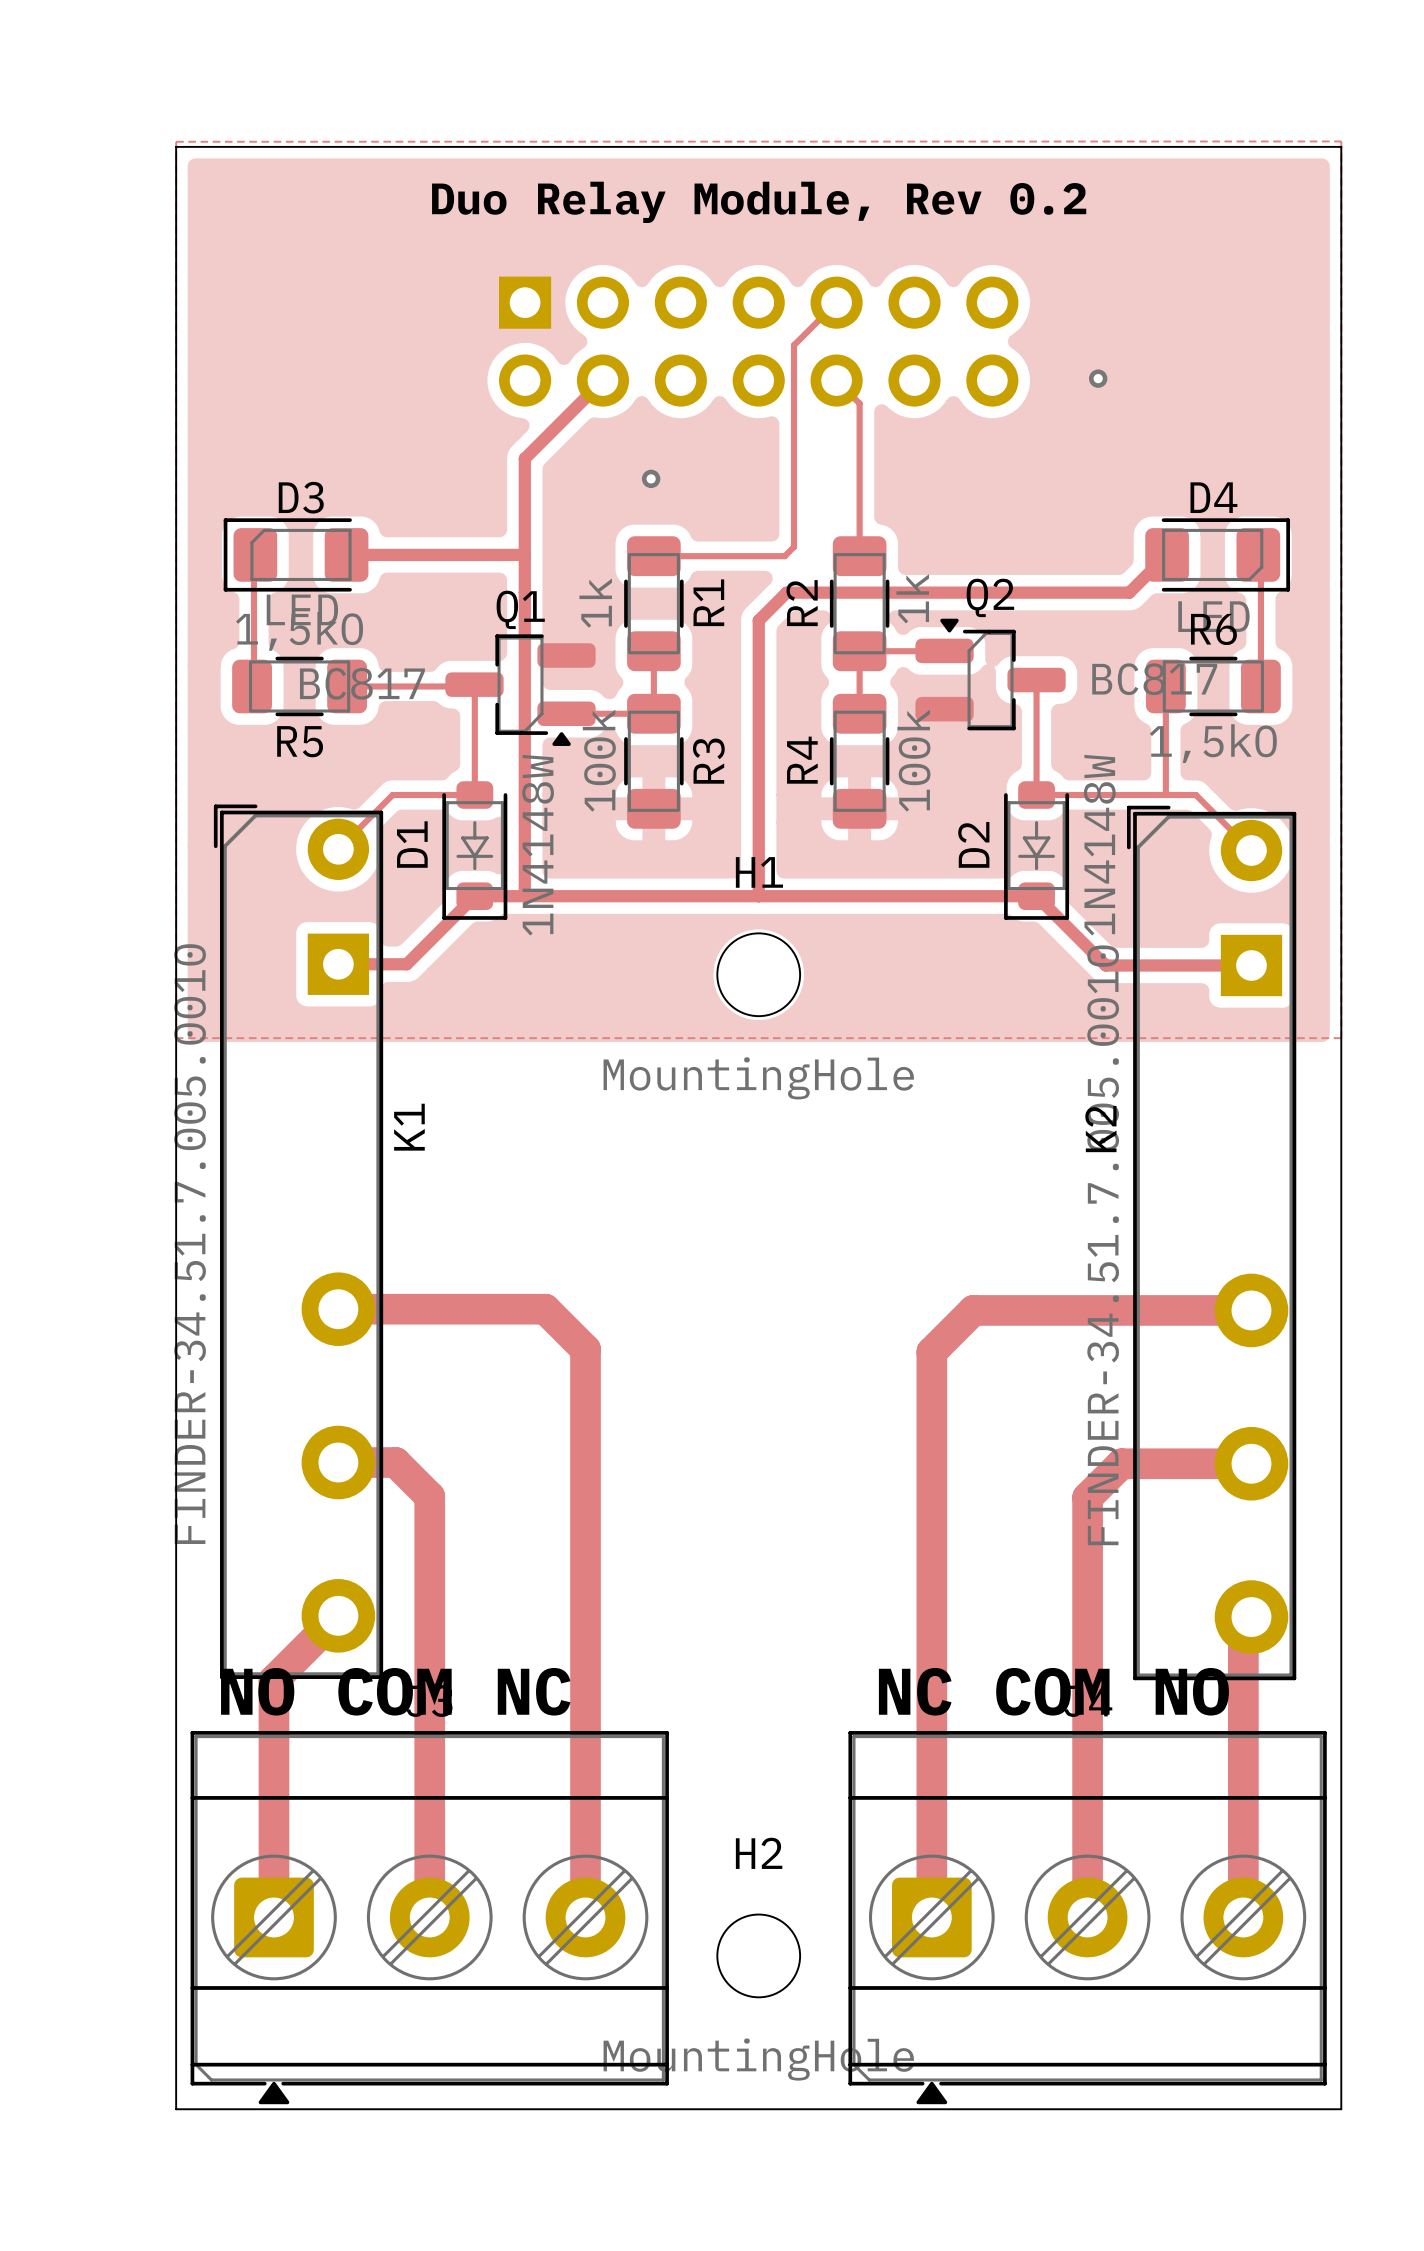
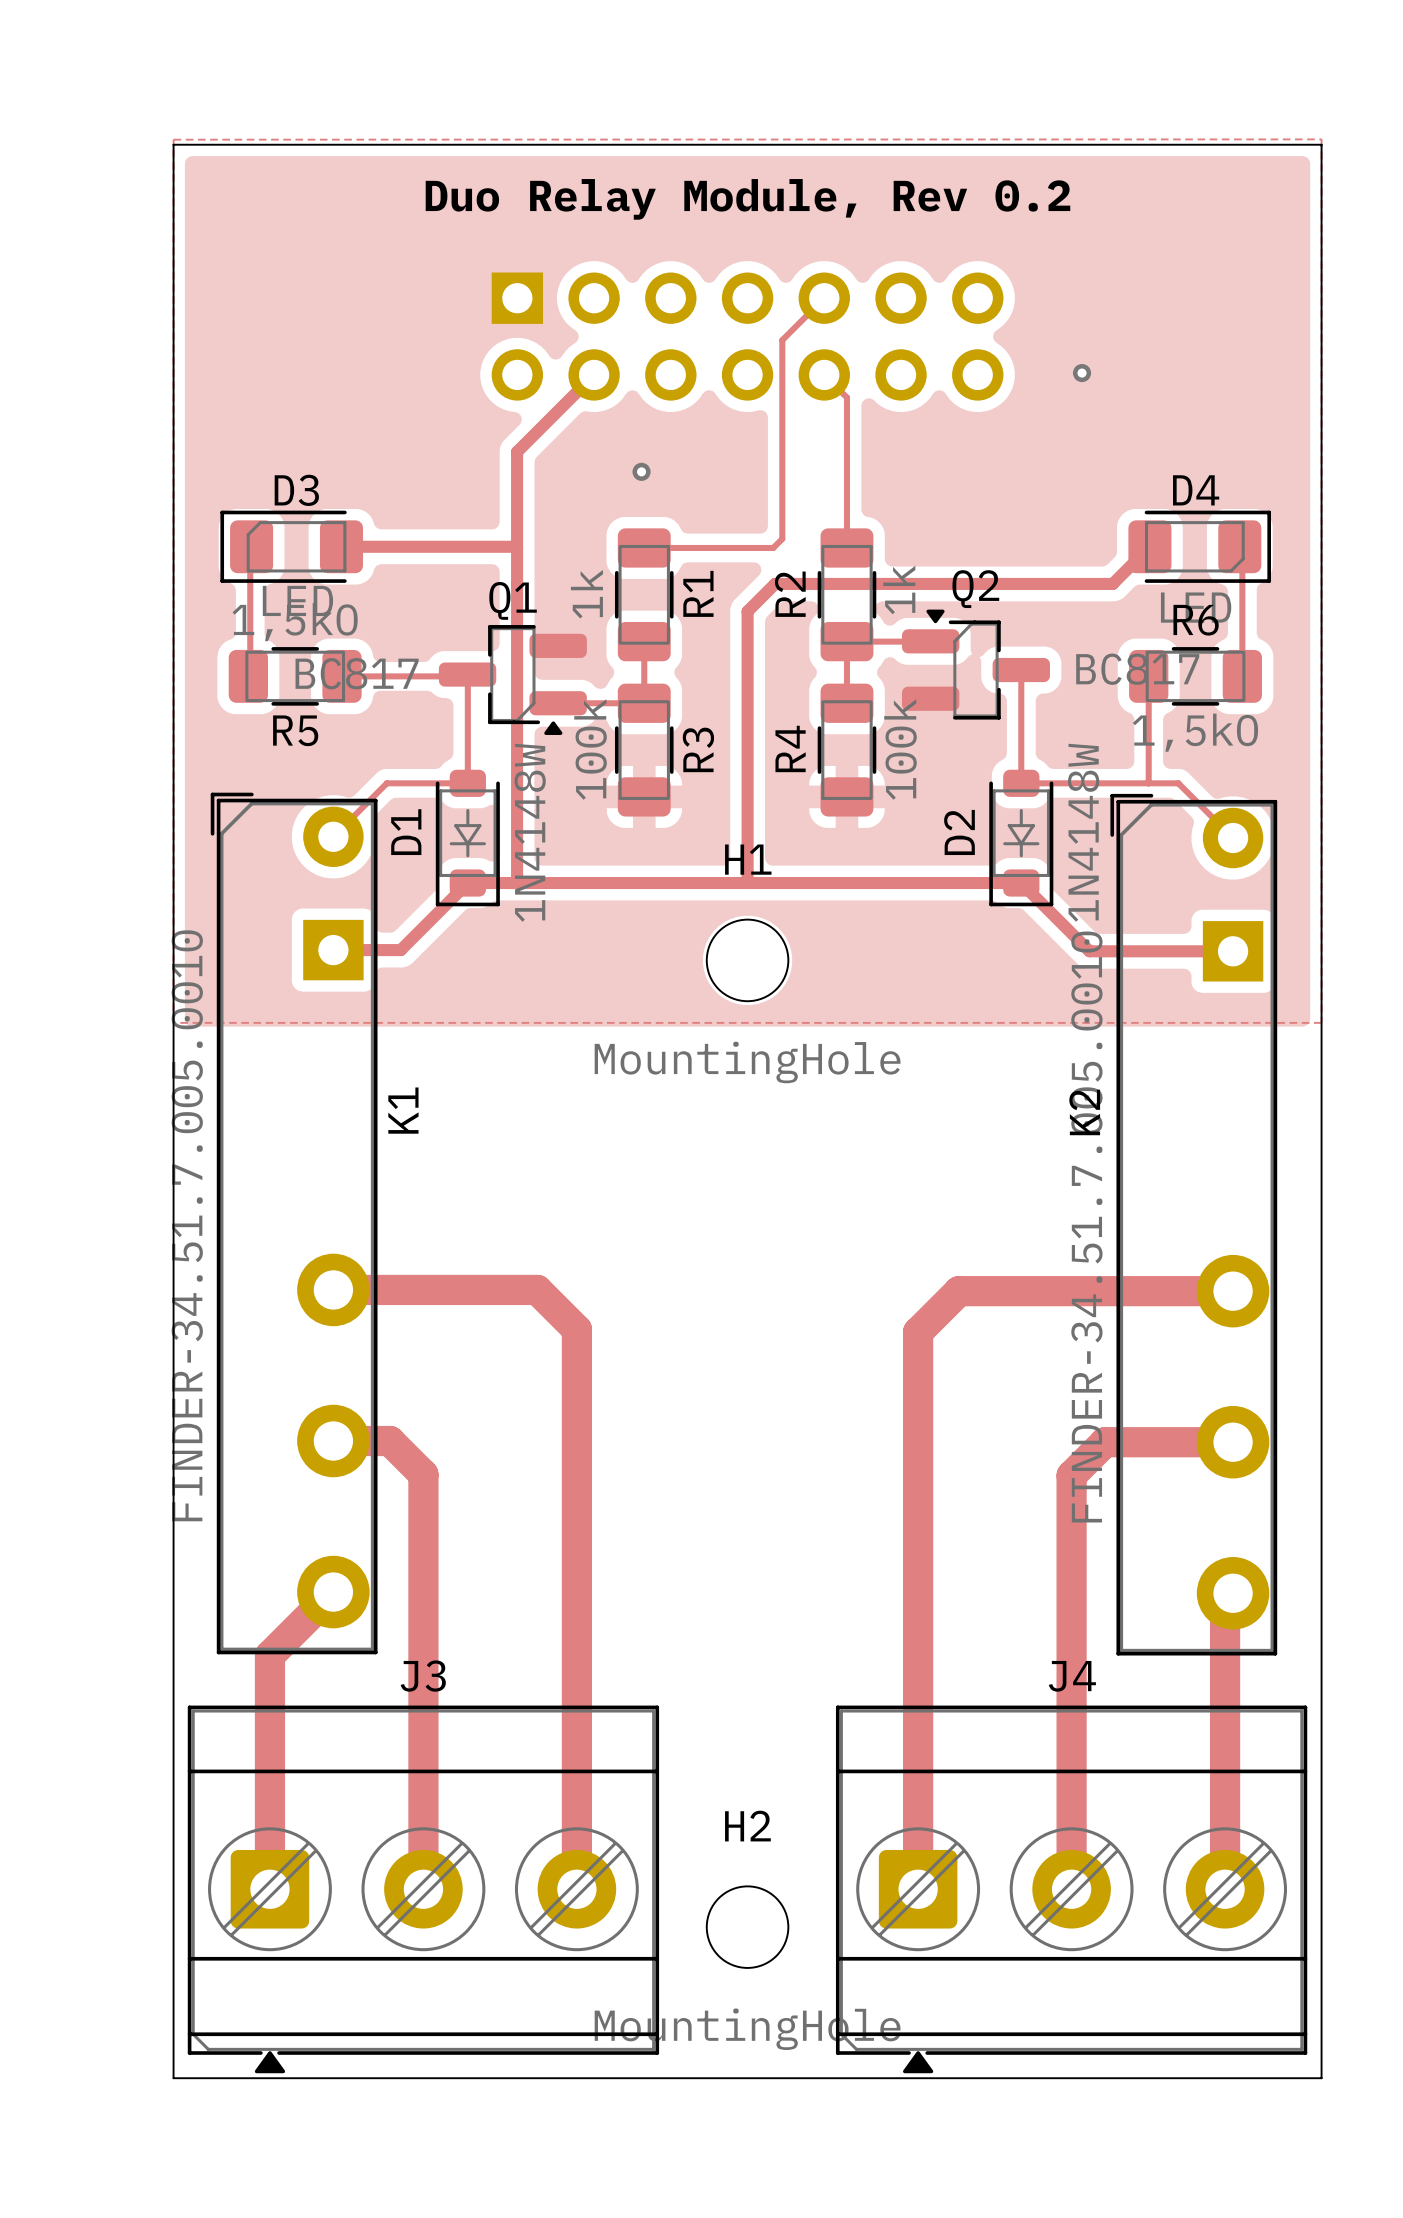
text: NO COM NC (395, 1691) -> none
text: NC COM NO (1053, 1691) -> none

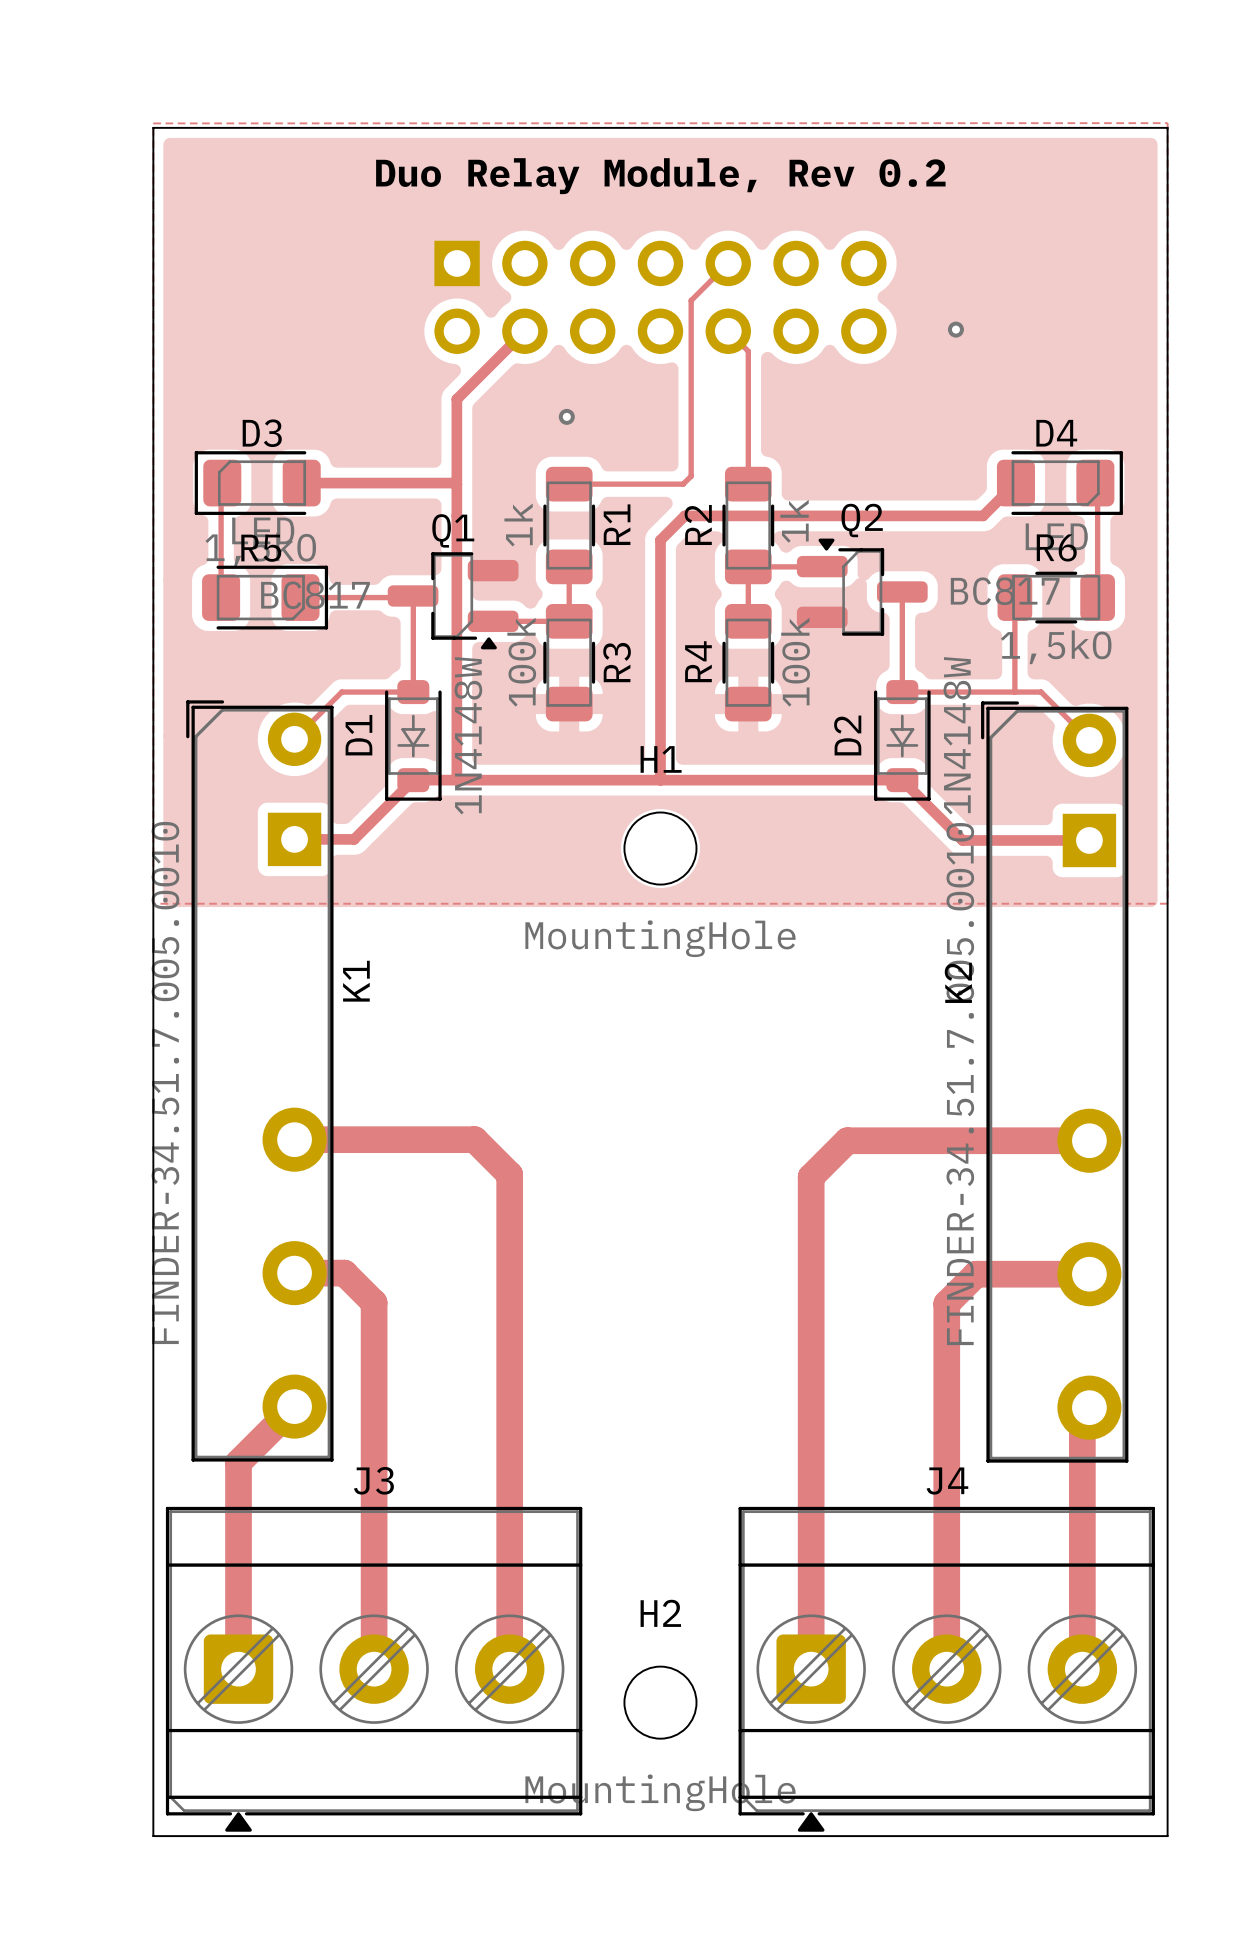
R5 footprint: [228, 647, 362, 706] -> [202, 565, 329, 630]
R5 name position: R5 (295, 730) -> R5 (261, 548)

